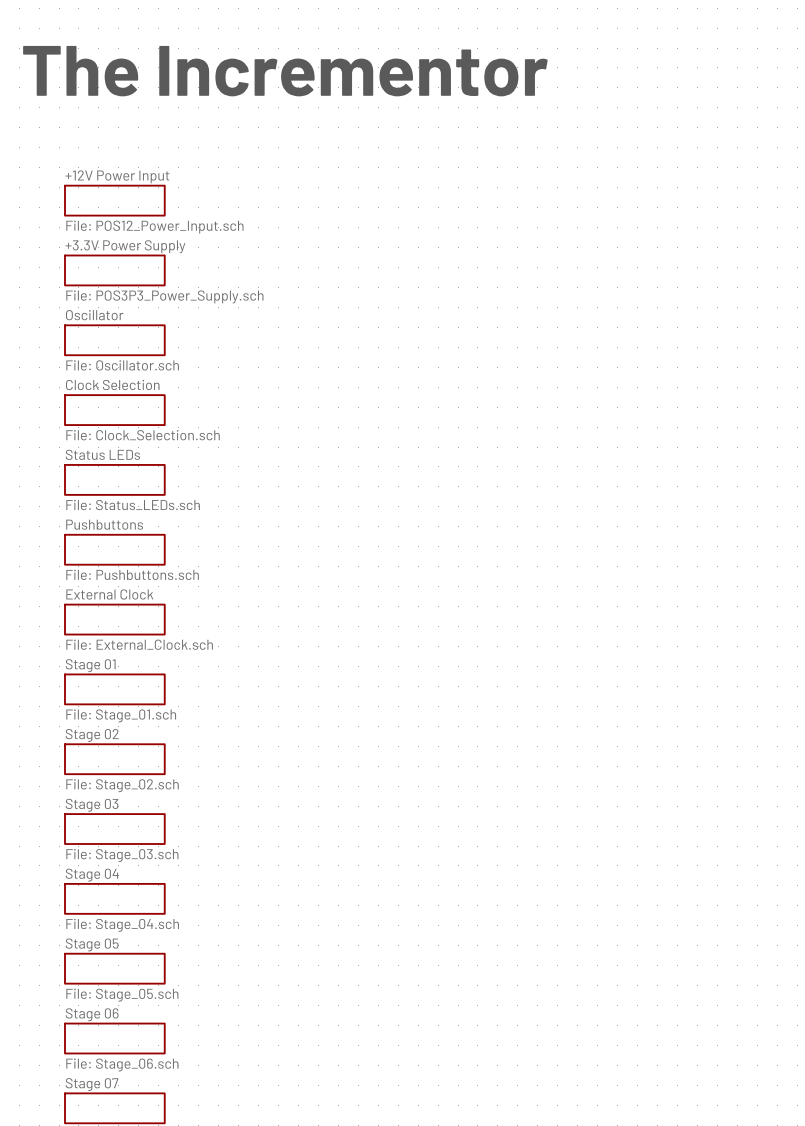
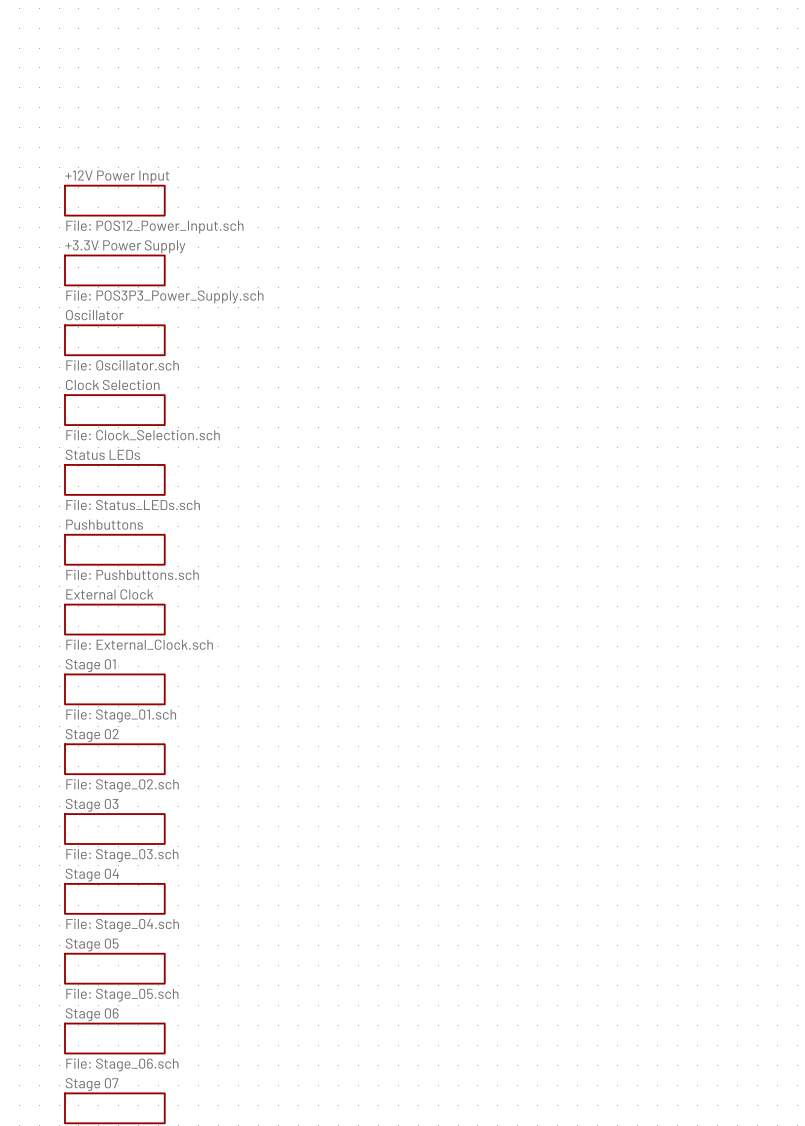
text: The Incrementor (285, 71) -> none

